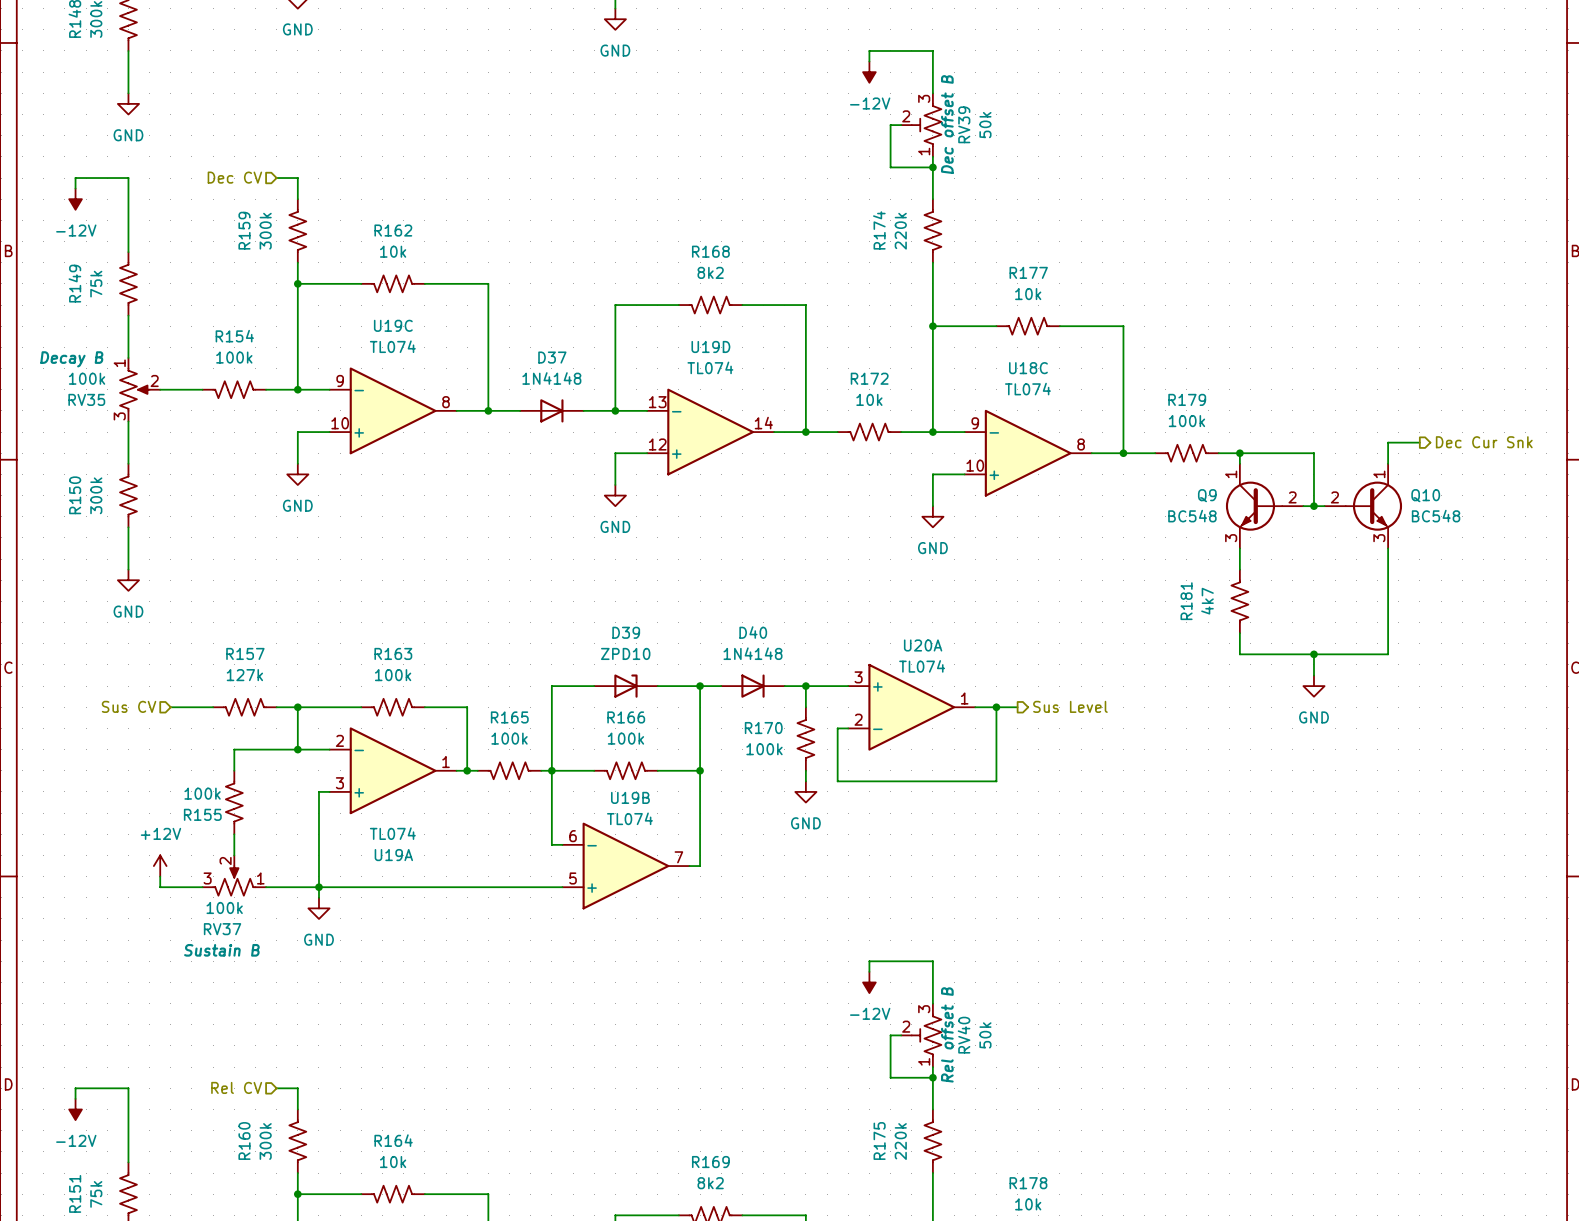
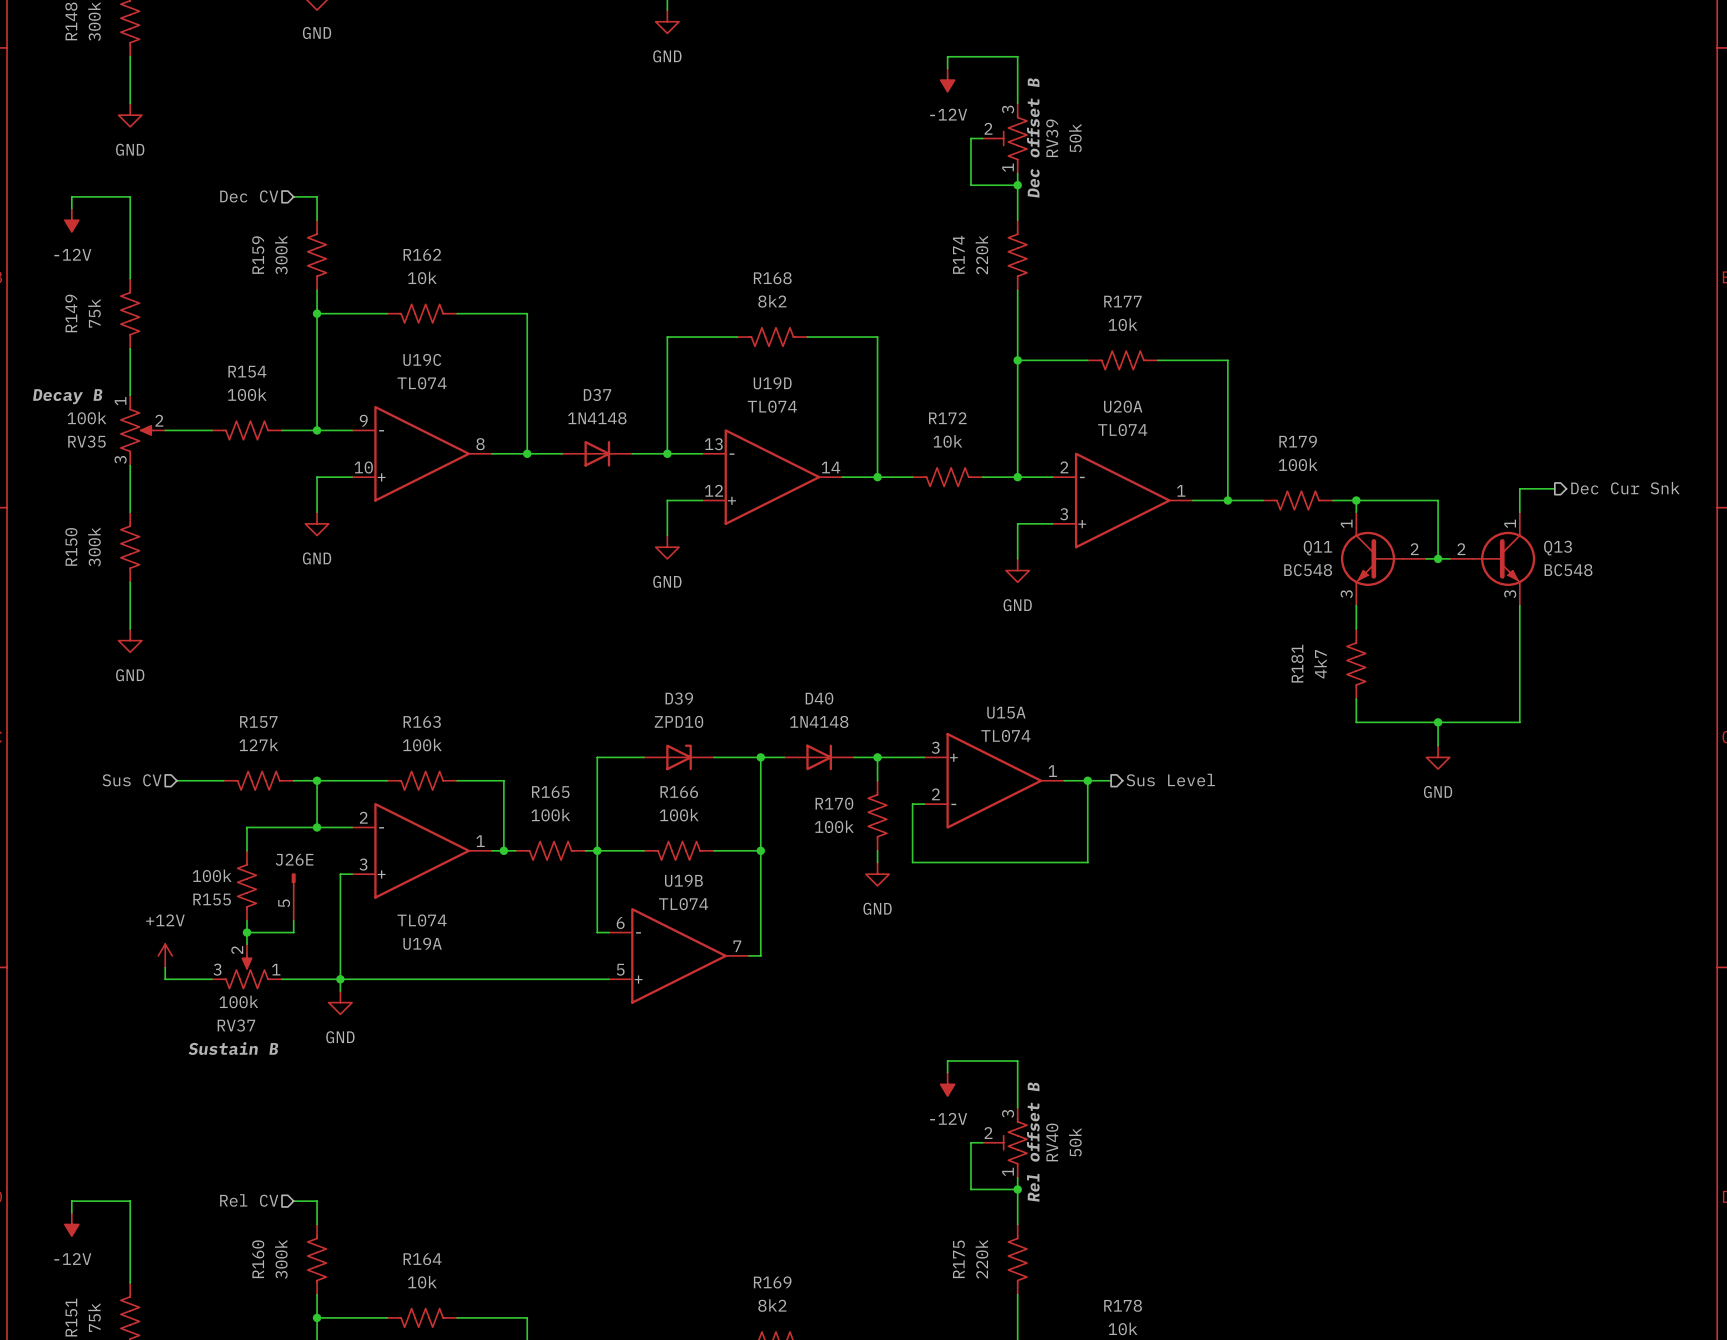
U18C name: U18C (1028, 368) -> U20A (1123, 406)
U18C pin number: 9 (975, 423) -> 2 (1064, 467)
U18C pin number: 8 (1081, 444) -> 1 (1181, 490)
U18C pin number: 10 (975, 465) -> 3 (1064, 514)
Q9 name: Q9 (1207, 495) -> Q11 (1317, 548)
Q10 name: Q10 (1425, 495) -> Q13 (1557, 548)
U20A name: U20A (923, 645) -> U15A (1006, 712)
J26E: none -> (293, 897)
wire: none -> (293, 920) (293, 932) (246, 932)
junction: none -> (246, 932)

